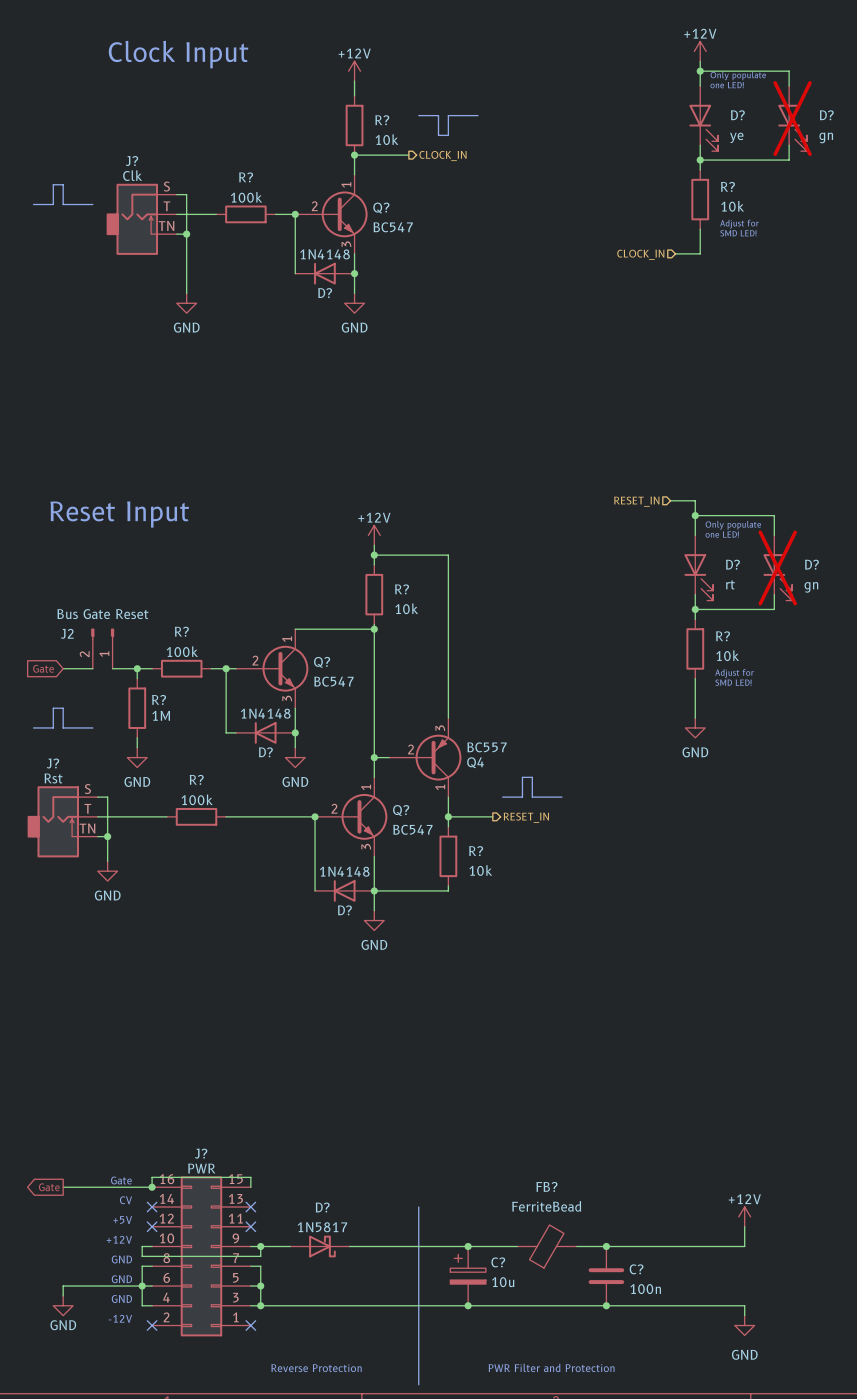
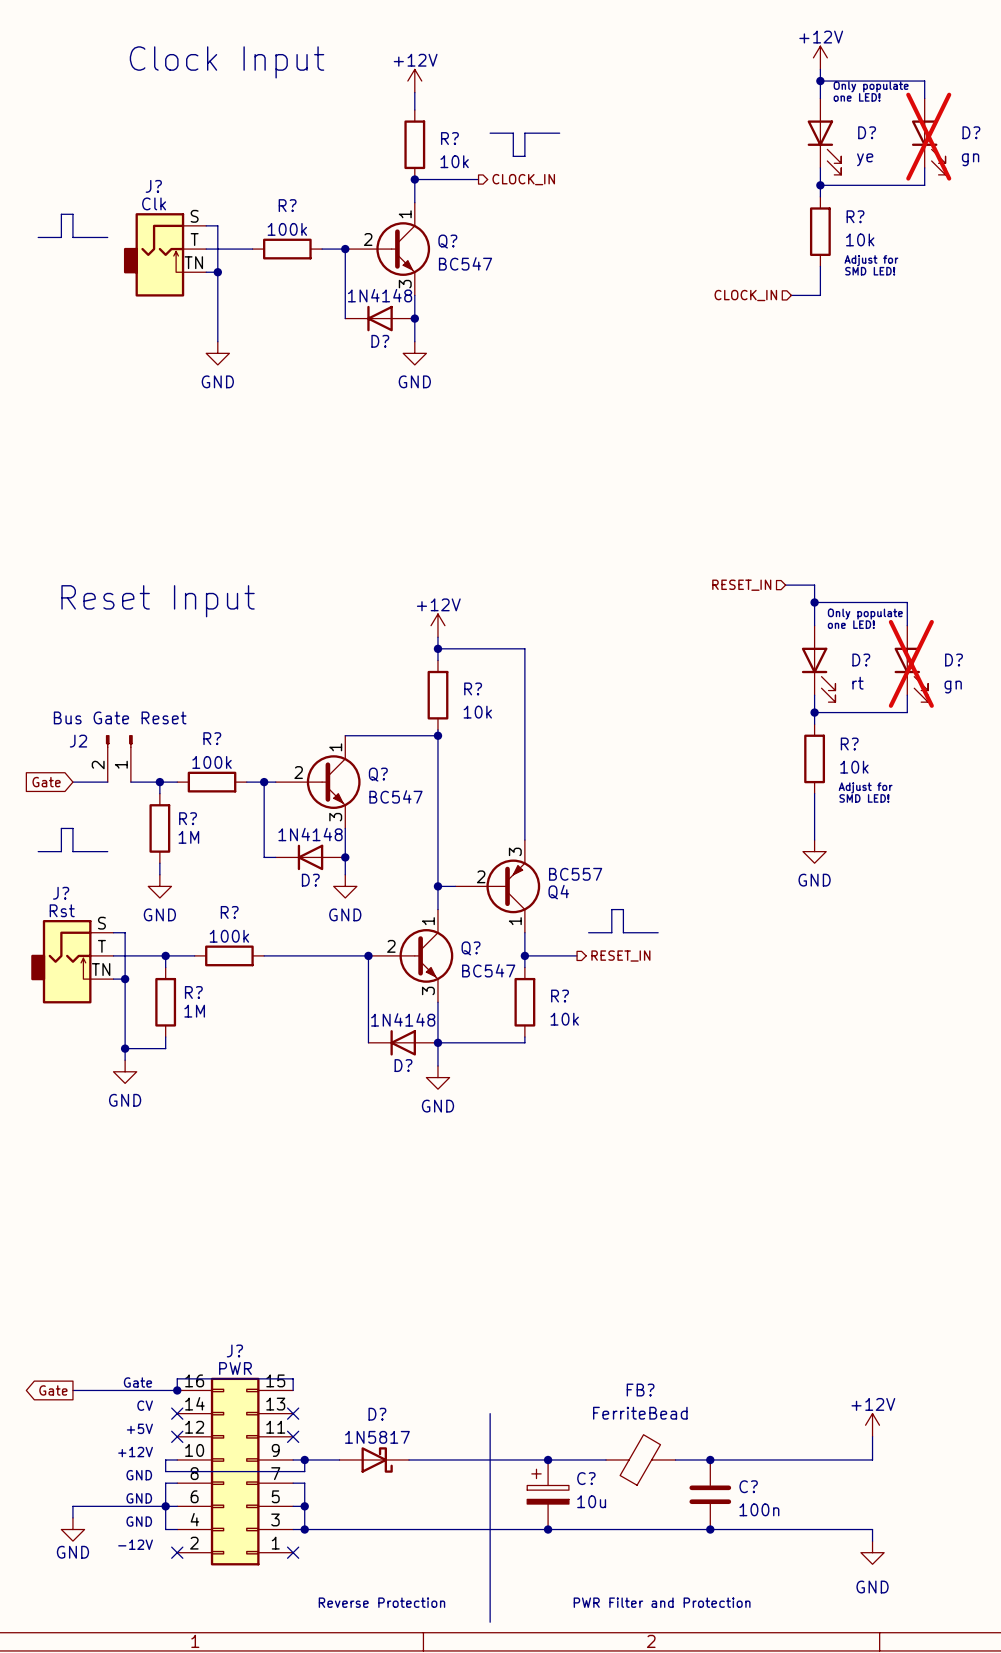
wire: none -> (165, 955) (165, 967)
junction: none -> (165, 955)
R?: none -> 1M (165, 1002)
wire: none -> (125, 1008) (125, 1060)
power symbol position: GND (107, 871) -> GND (125, 1071)
wire: none -> (165, 1037) (165, 1048) (125, 1048)
junction: none -> (125, 1048)

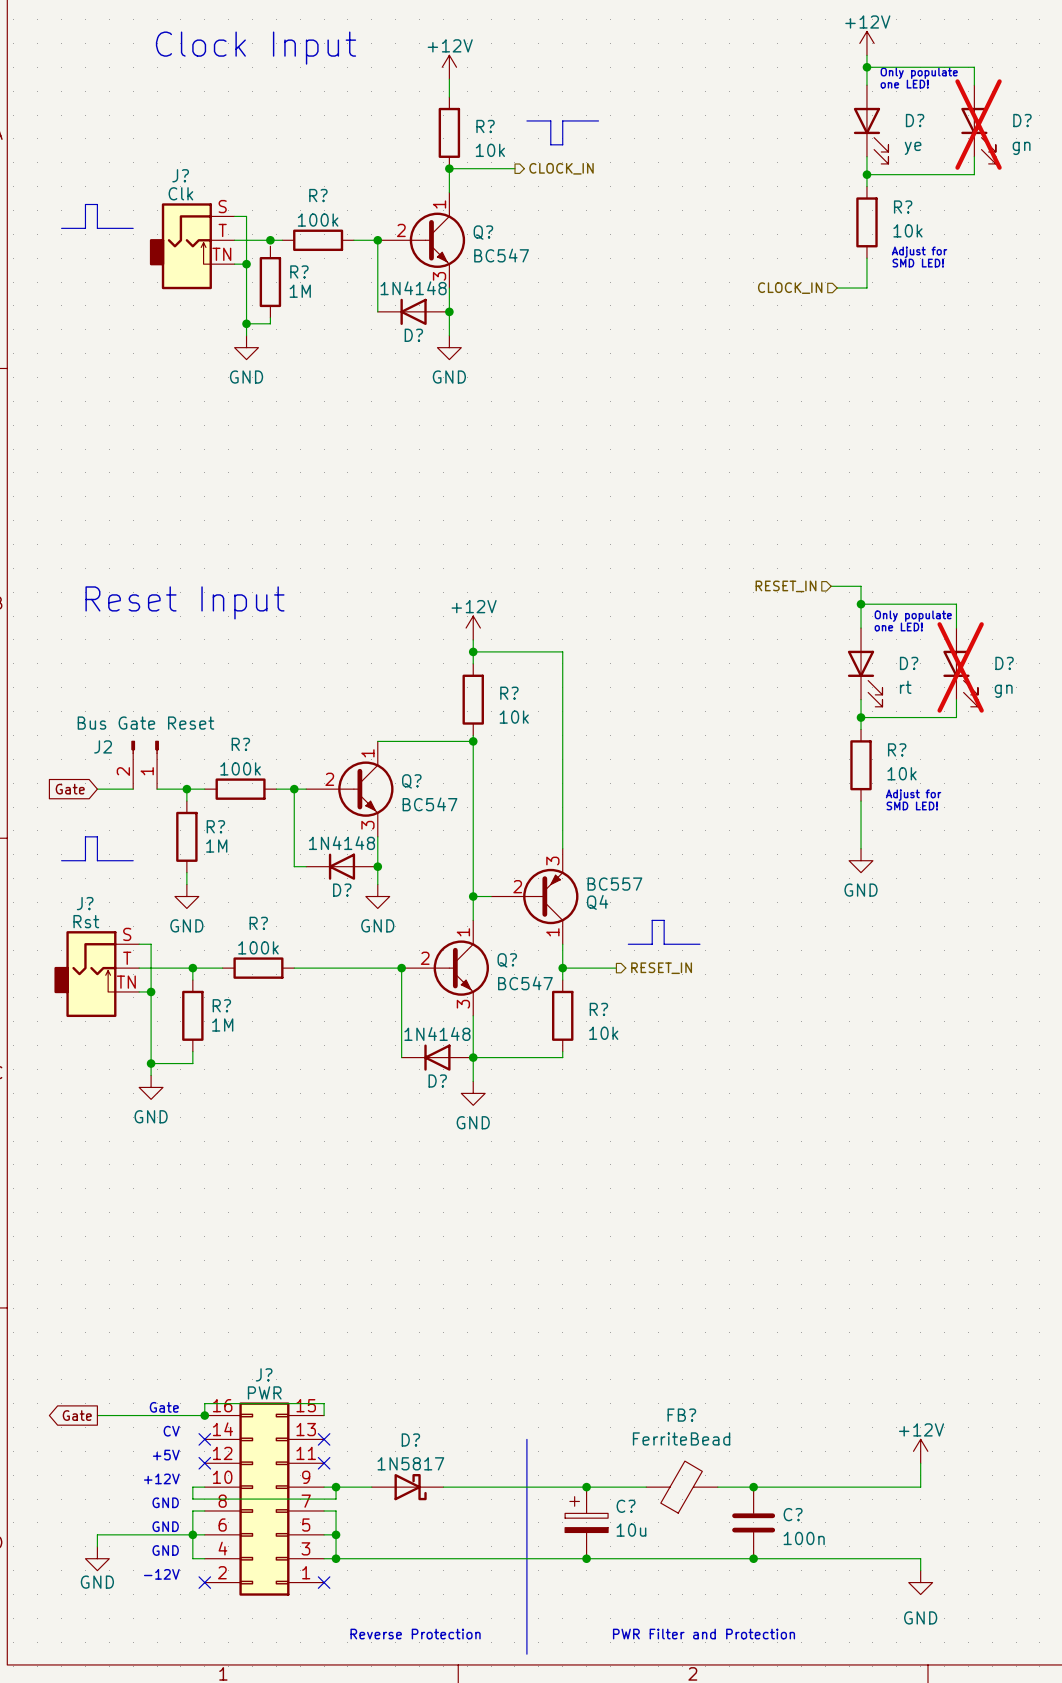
junction: none -> (270, 240)
R?: none -> 1M (270, 282)
wire: none -> (270, 317) (270, 323) (246, 323)
junction: none -> (246, 323)

